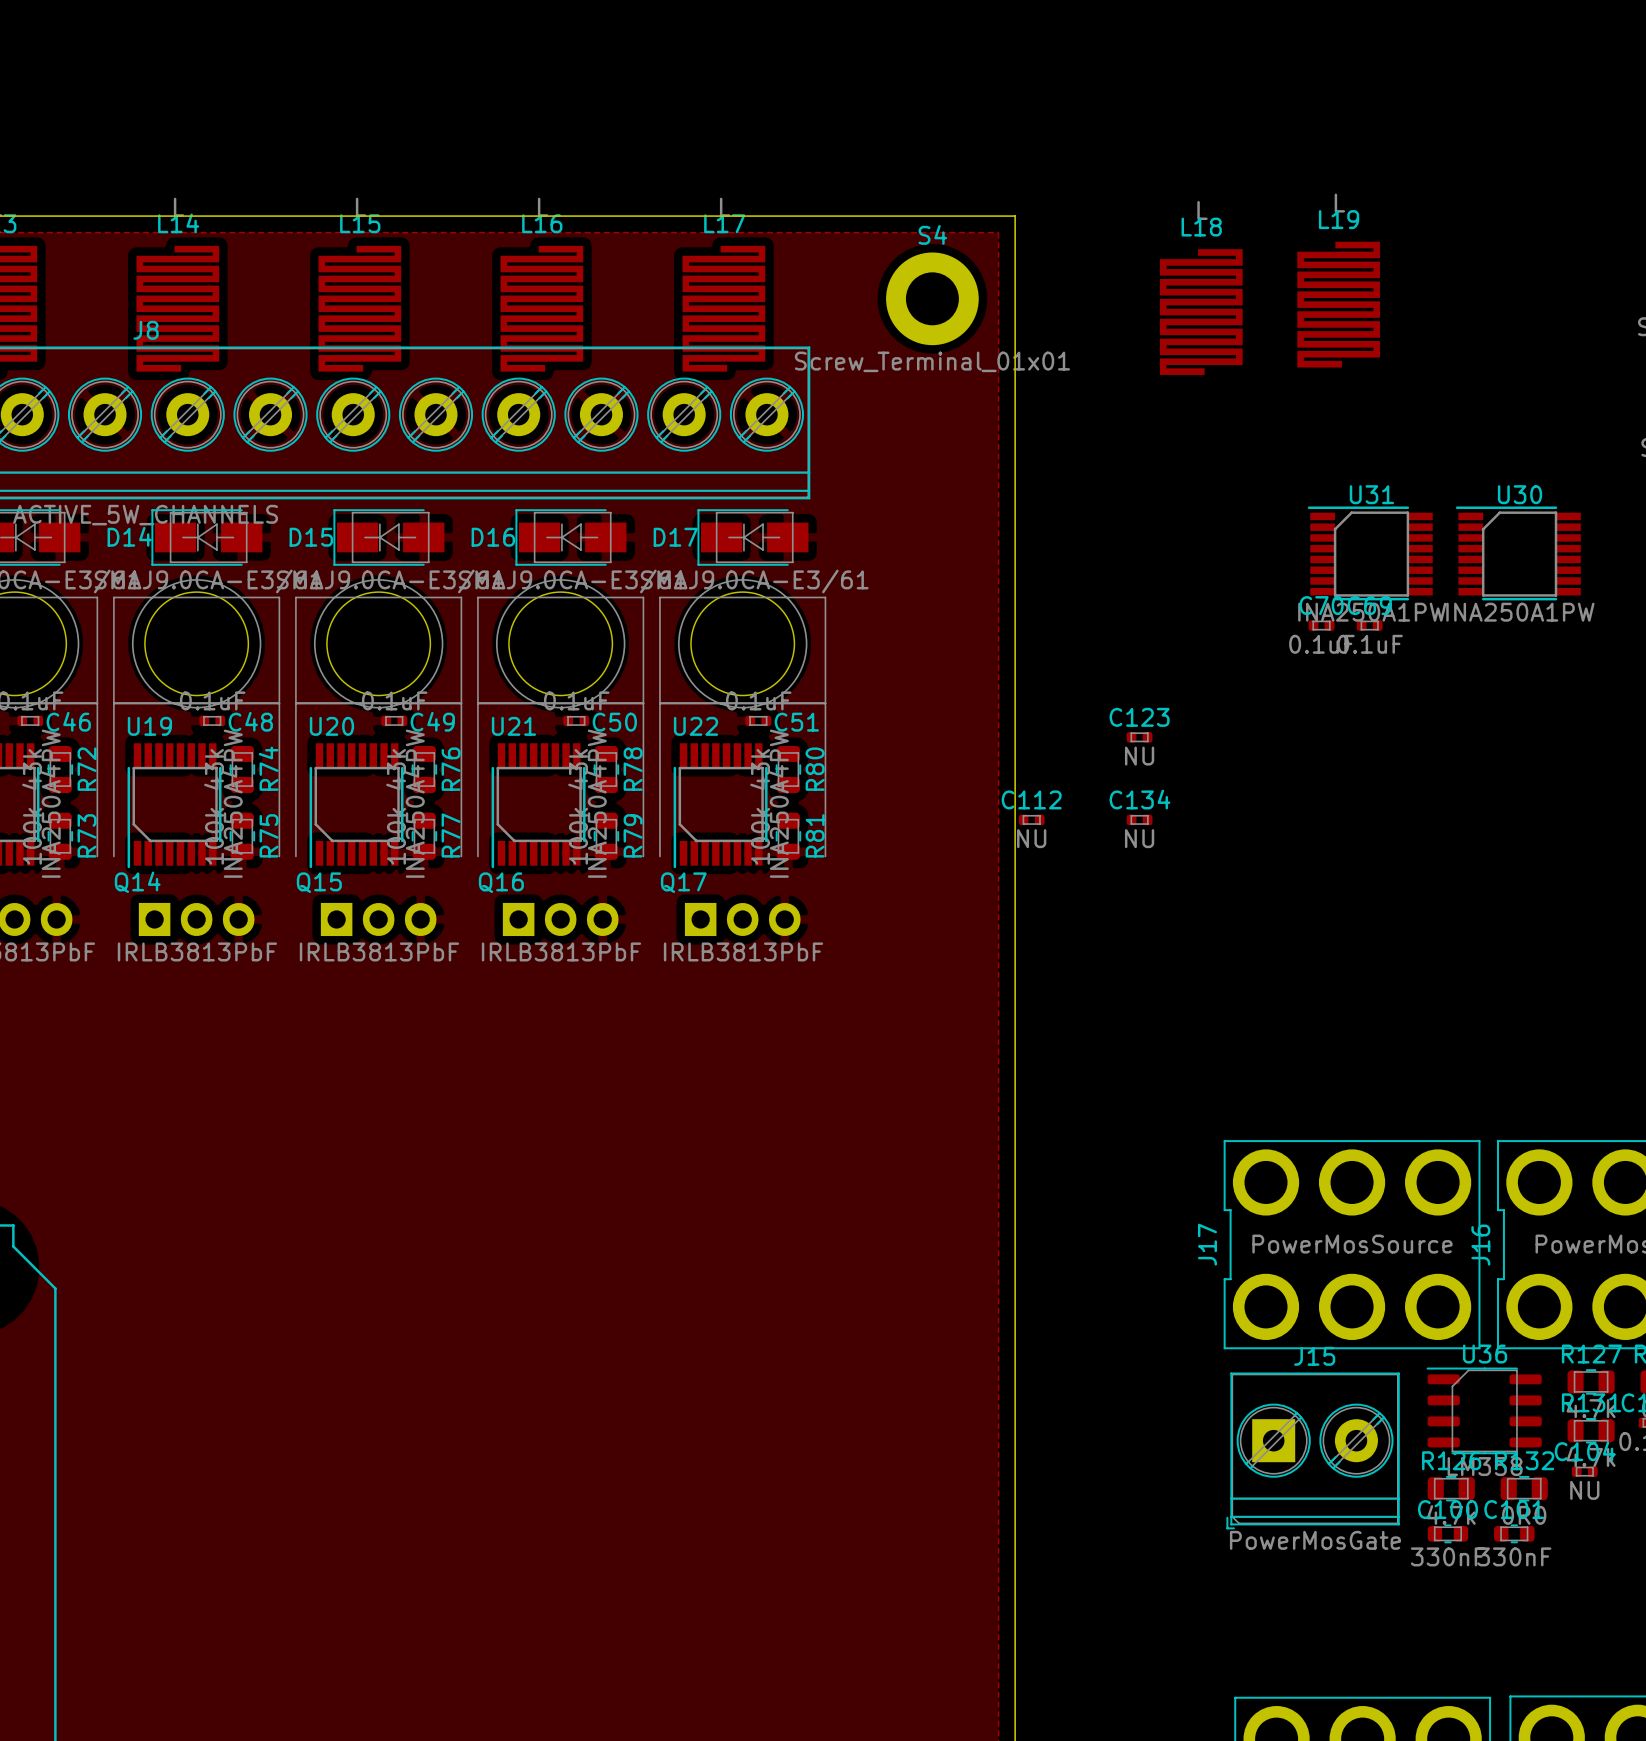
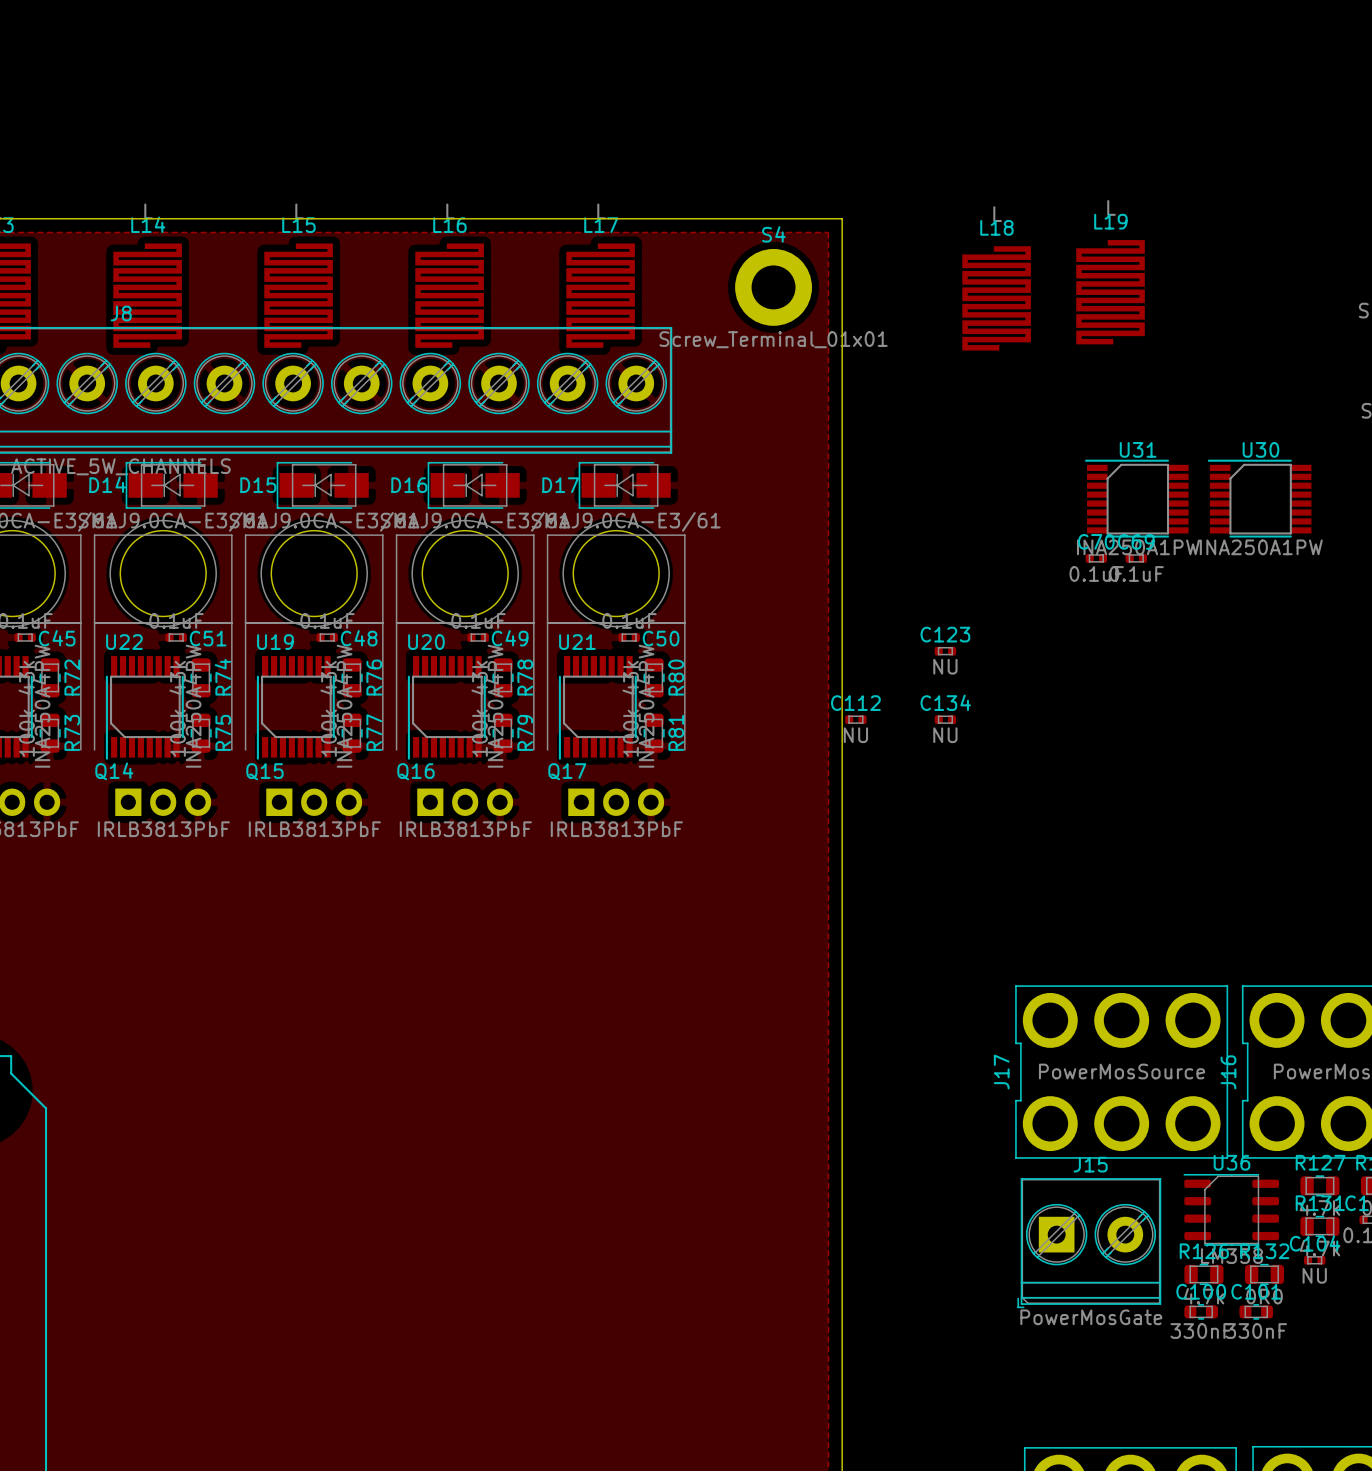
C46 name: C46 (68, 721) -> C45 (57, 638)
C48 name: C48 (250, 721) -> C51 (208, 638)
C49 name: C49 (432, 721) -> C48 (359, 638)
C50 name: C50 (614, 722) -> C49 (510, 638)
C51 name: C51 (796, 722) -> C50 (661, 638)
U19 name: U19 (149, 726) -> U22 (124, 642)
U20 name: U20 (331, 726) -> U19 (275, 642)
U21 name: U21 (513, 726) -> U20 (426, 642)
U22 name: U22 (695, 726) -> U21 (577, 642)

